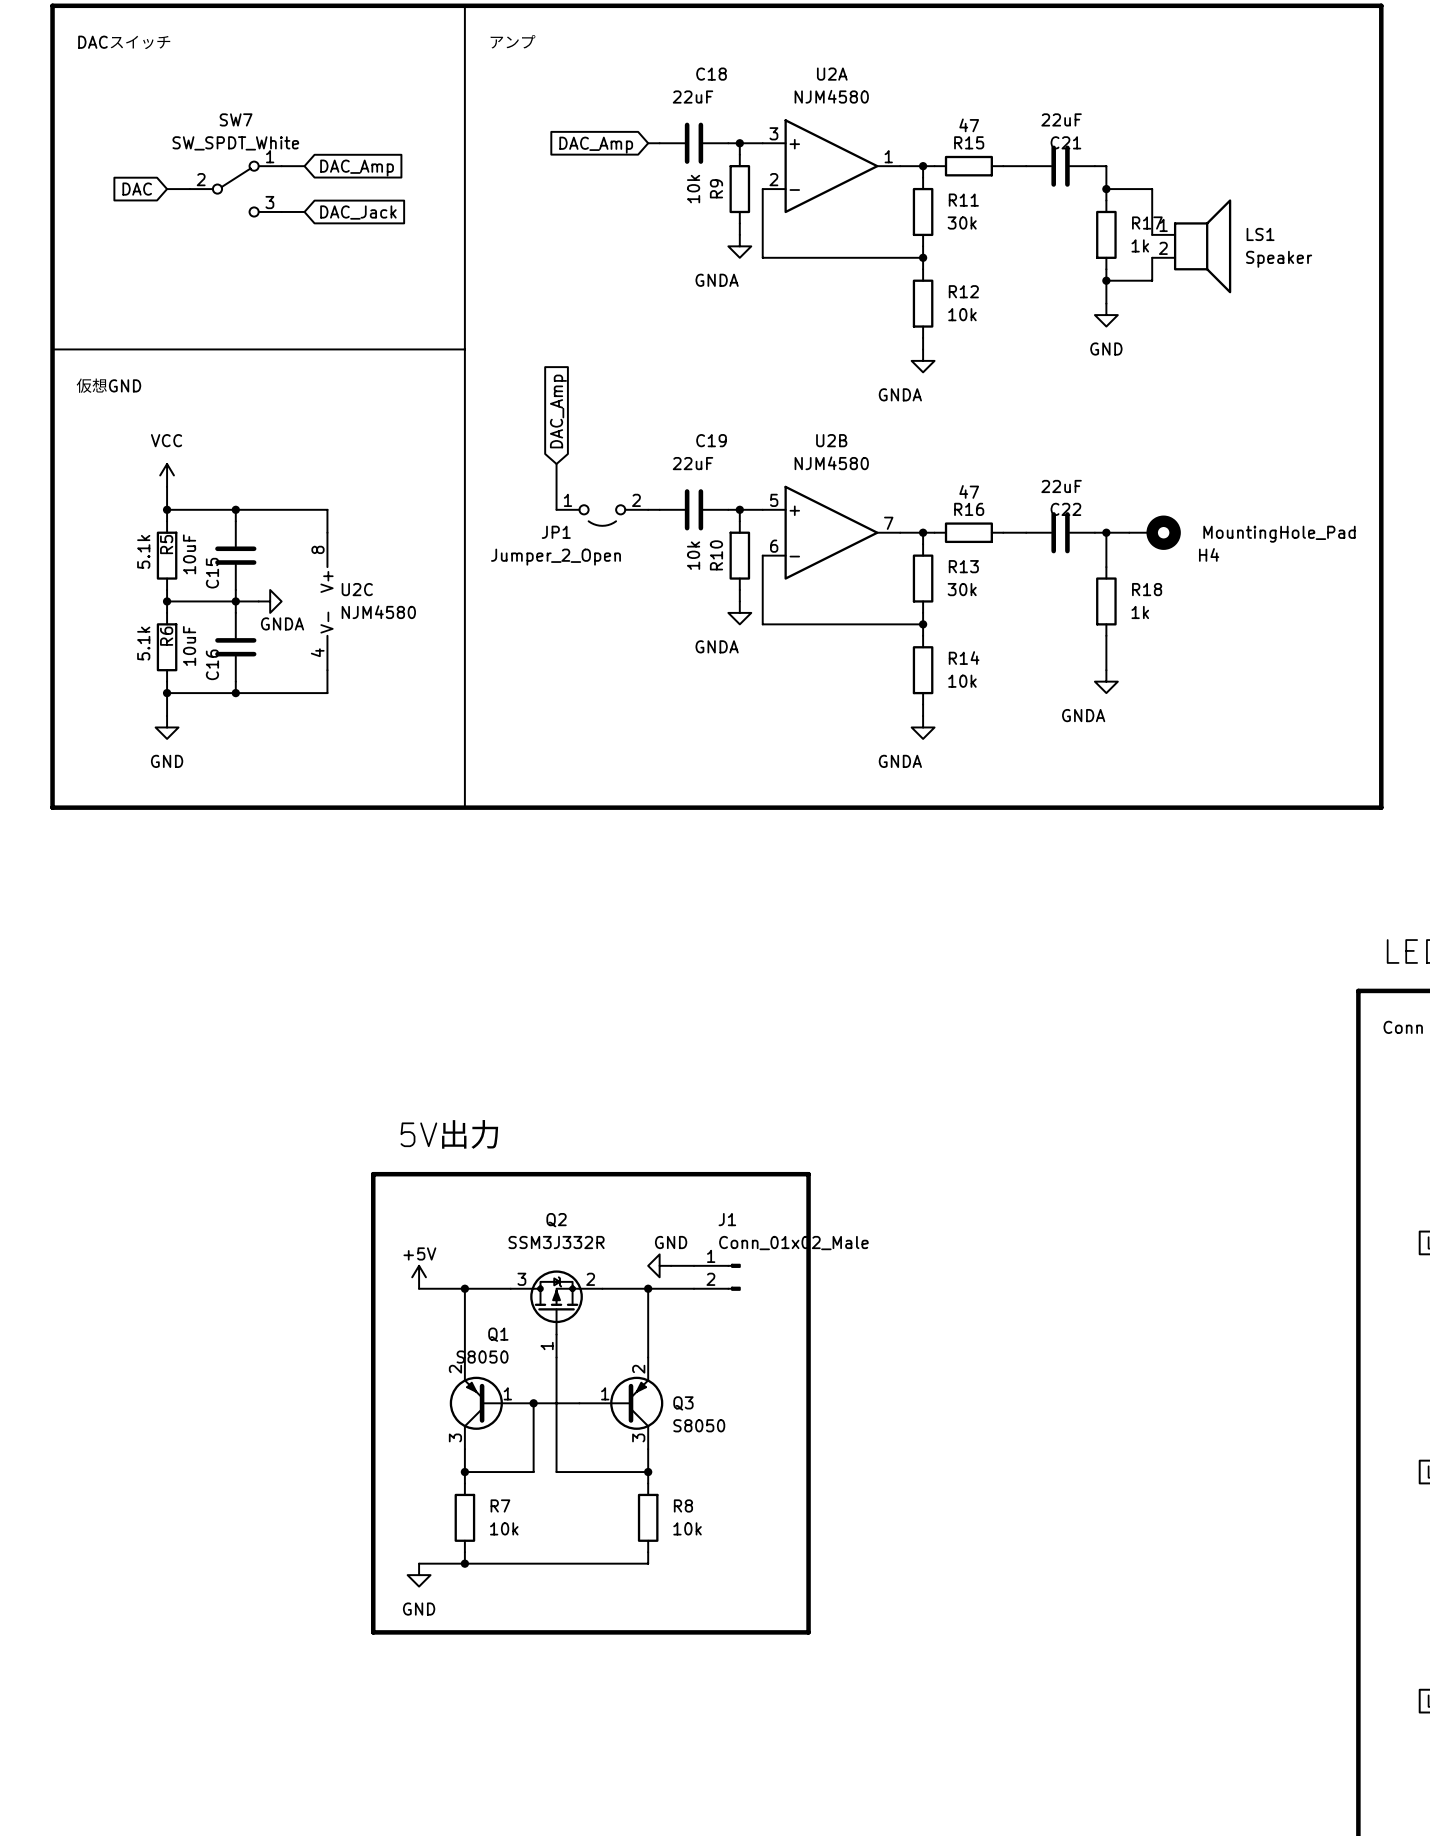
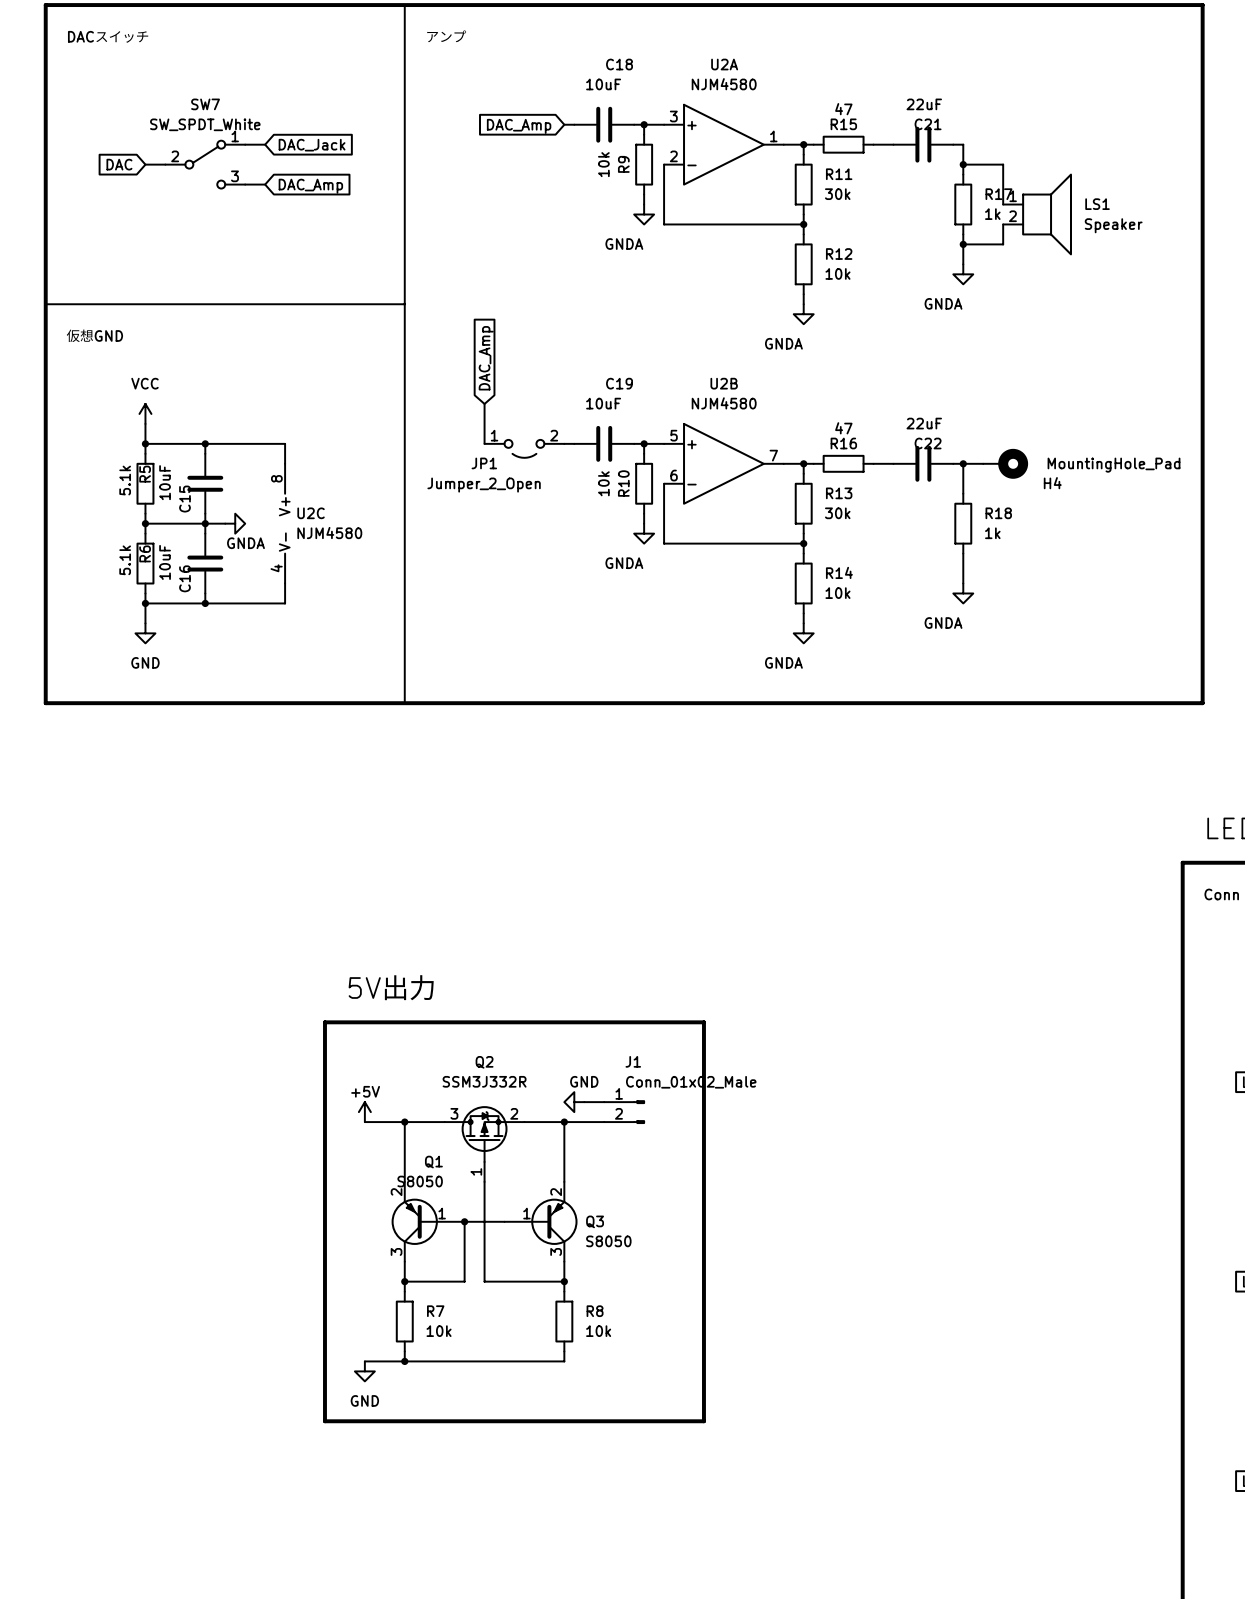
C18 value: 22uF (692, 97) -> 10uF (603, 84)
global label: DAC_Amp (357, 168) -> DAC_Jack (312, 145)
global label: DAC_Jack (358, 212) -> DAC_Amp (310, 186)
power symbol: GND (1106, 315) -> GNDA (963, 274)
C19 value: 22uF (692, 463) -> 10uF (603, 403)

